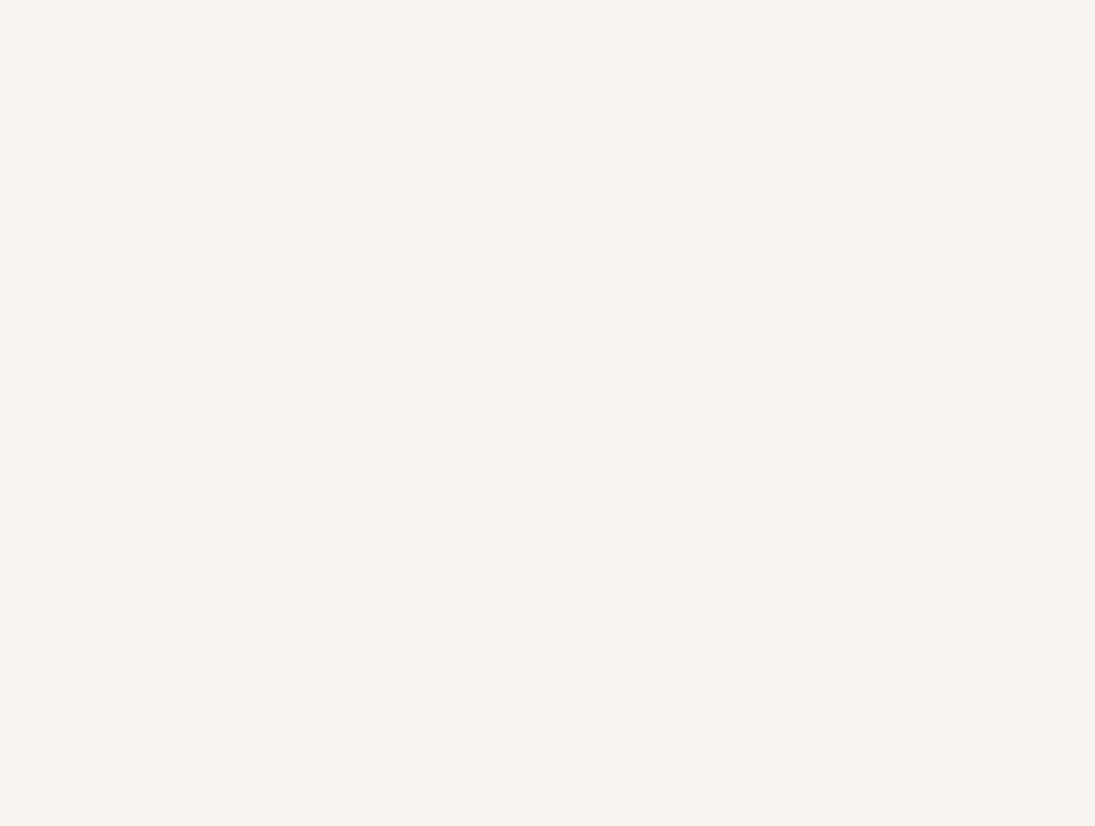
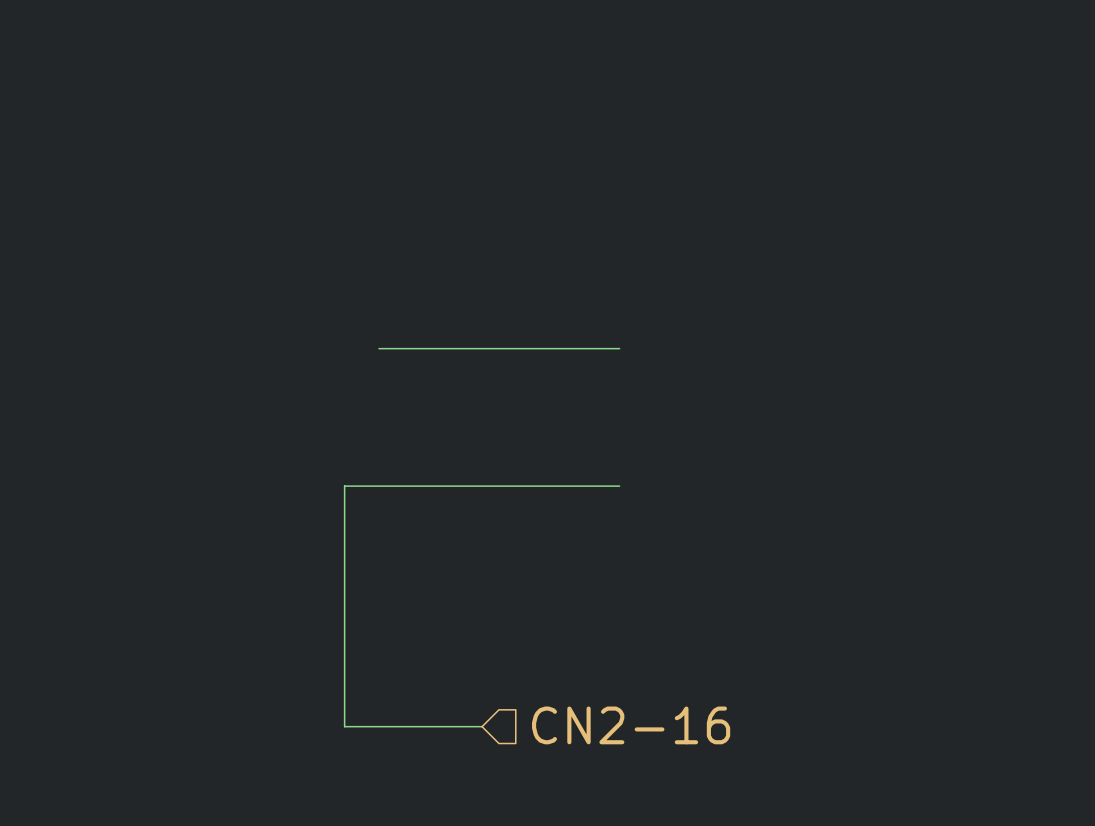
wire: none -> (378, 348) (619, 348)
wire: none -> (619, 486) (344, 486) (344, 726) (482, 726)
hierarchical label: none -> CN2-16 (631, 725)

